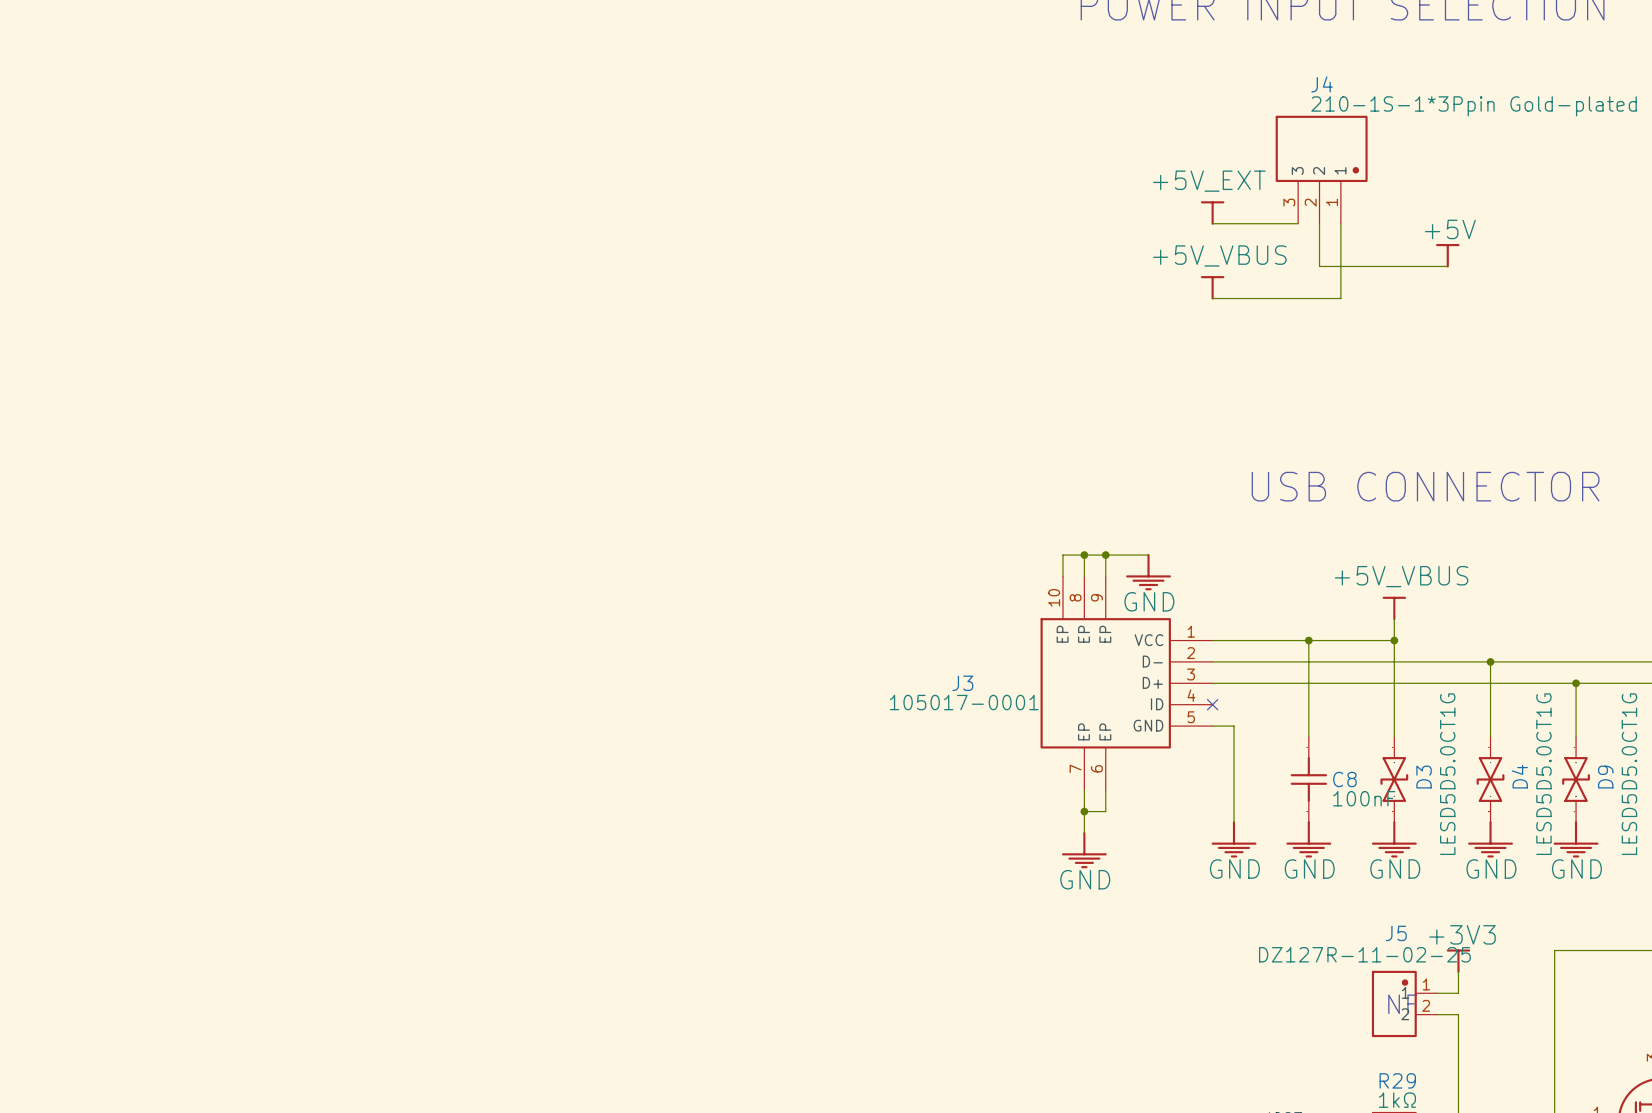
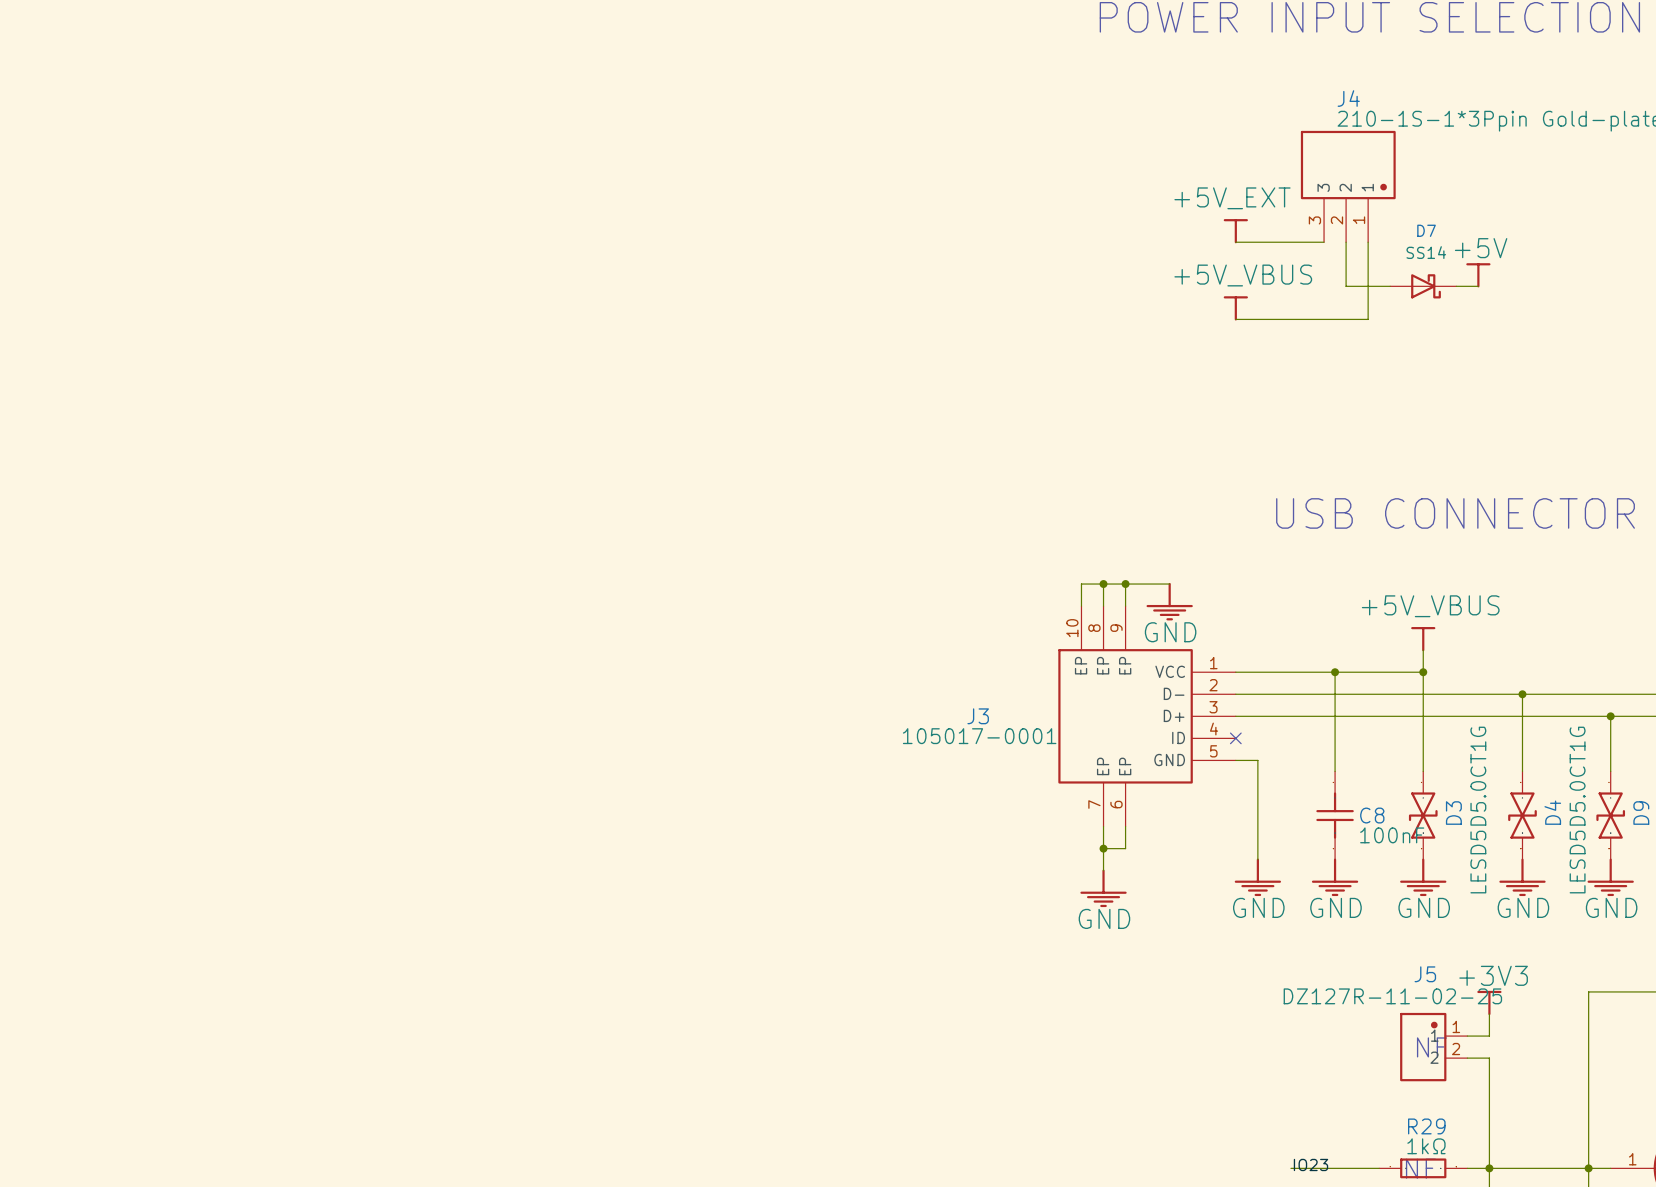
D7: none -> SS14 (1423, 286)

